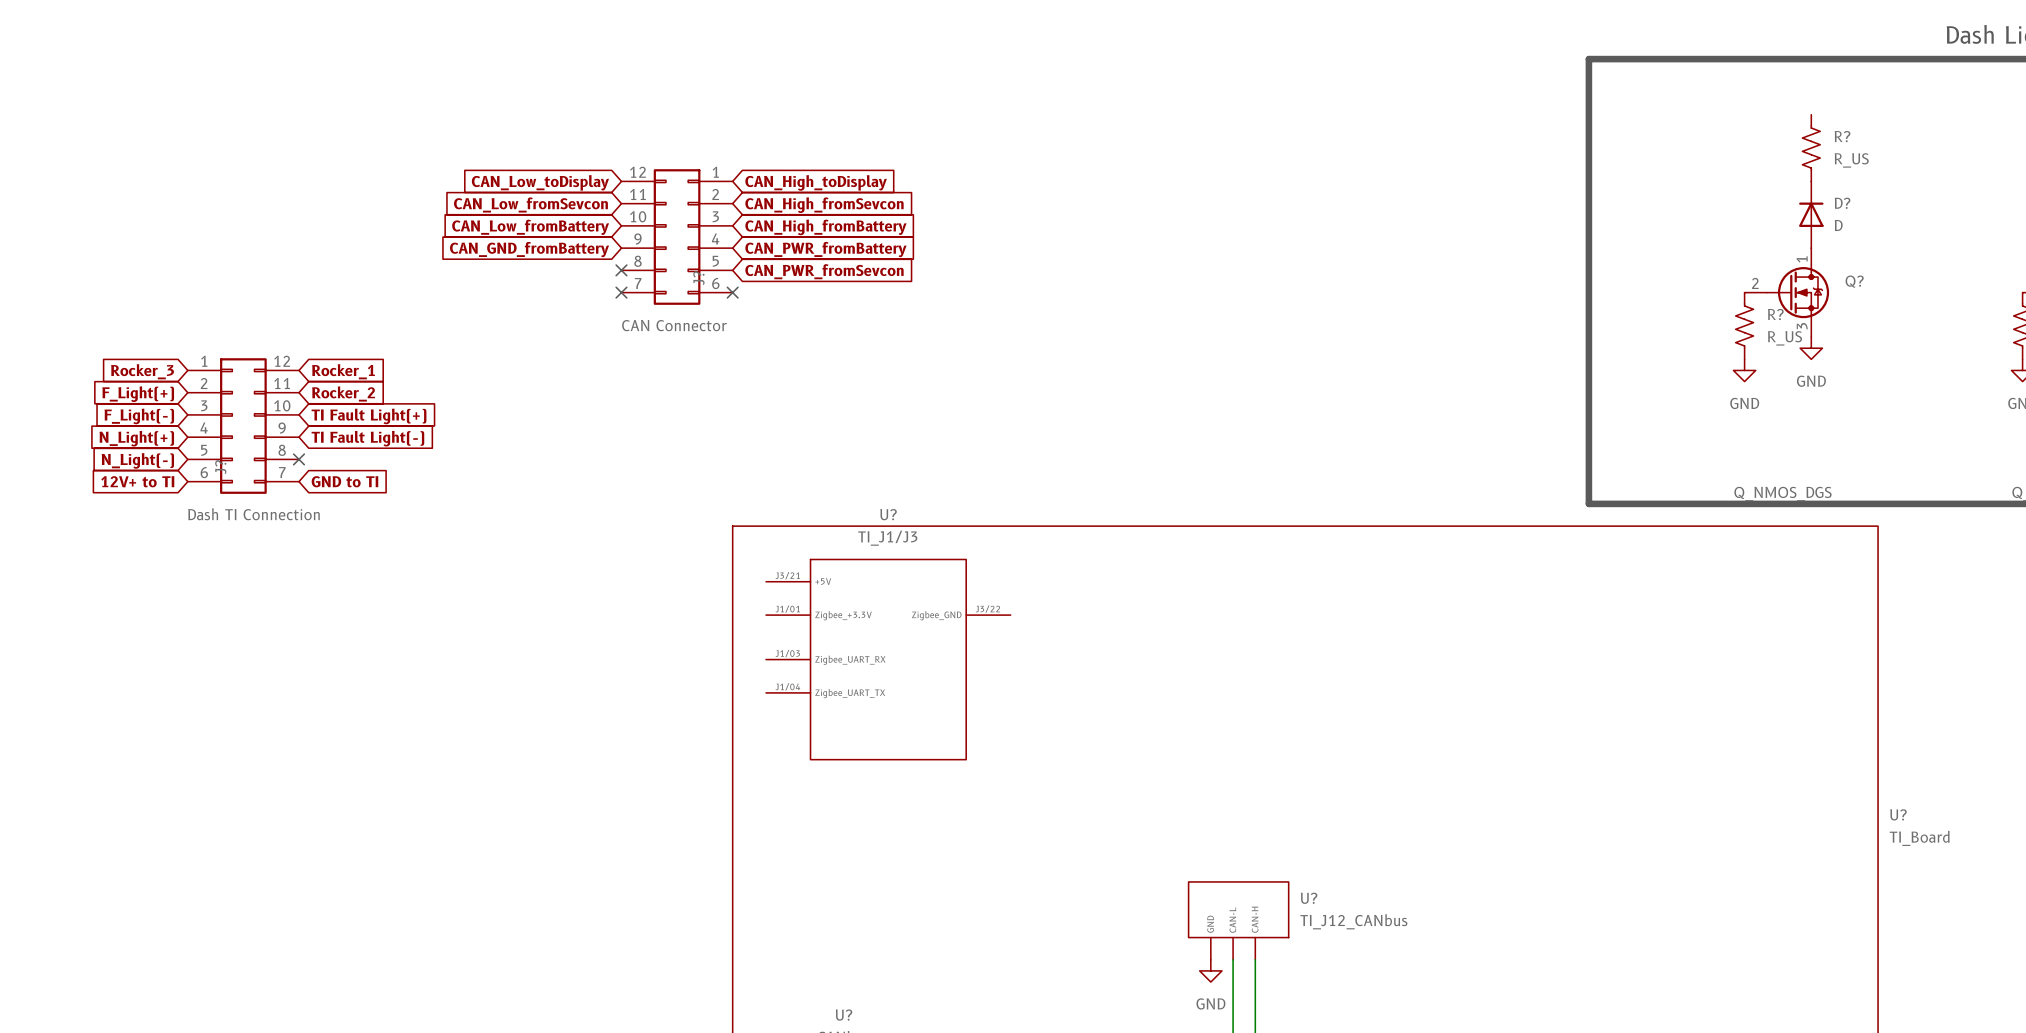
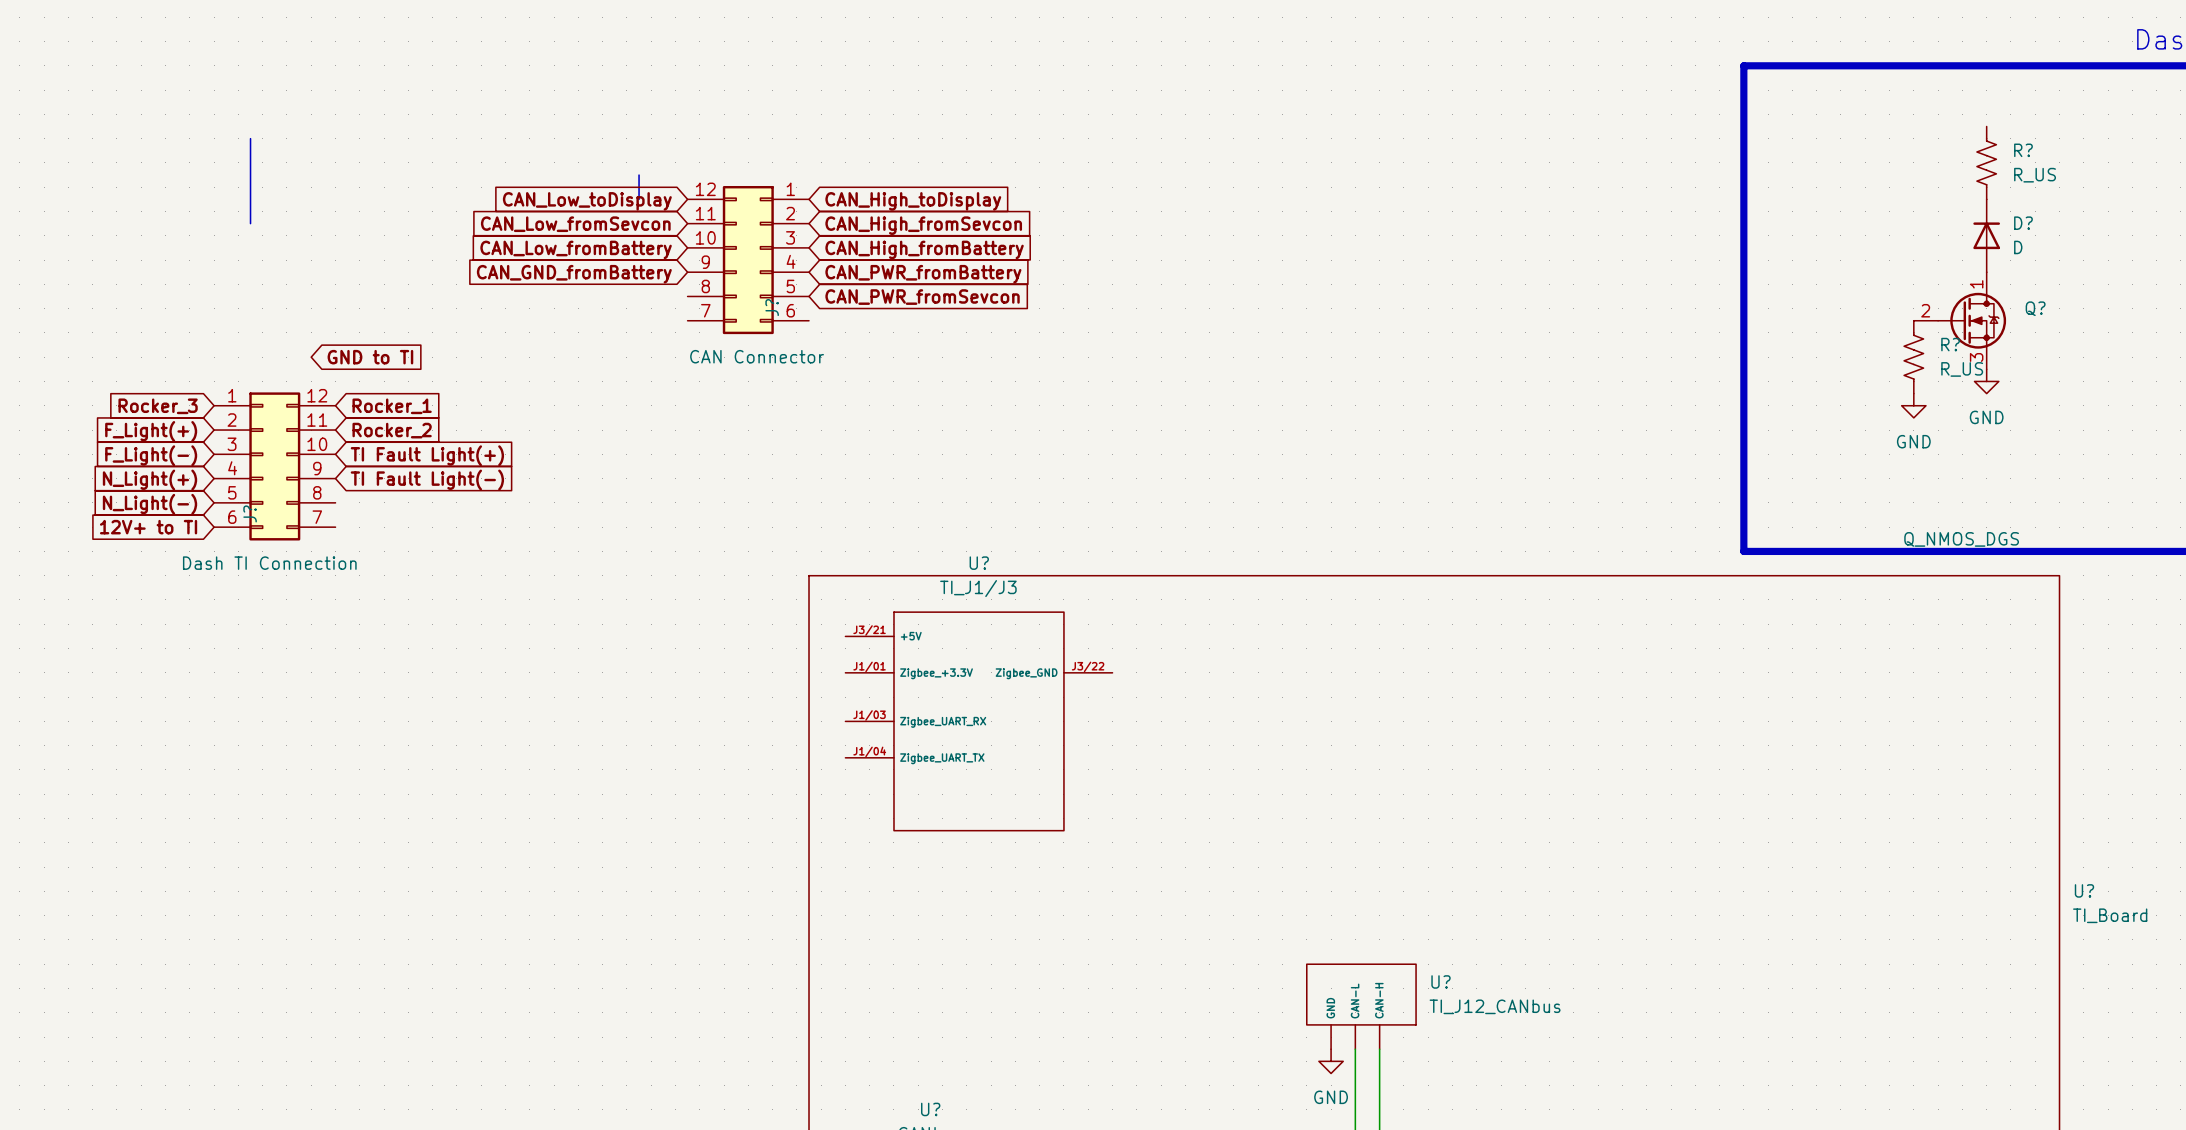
bus: none -> (250, 138) (250, 223)
bus: none -> (639, 175) (639, 199)
no-connect mark: (621, 270) -> none
no-connect mark: (621, 292) -> none
no-connect mark: (732, 292) -> none
no-connect mark: (298, 459) -> none
global label position: GND to TI (344, 481) -> GND to TI (370, 357)

